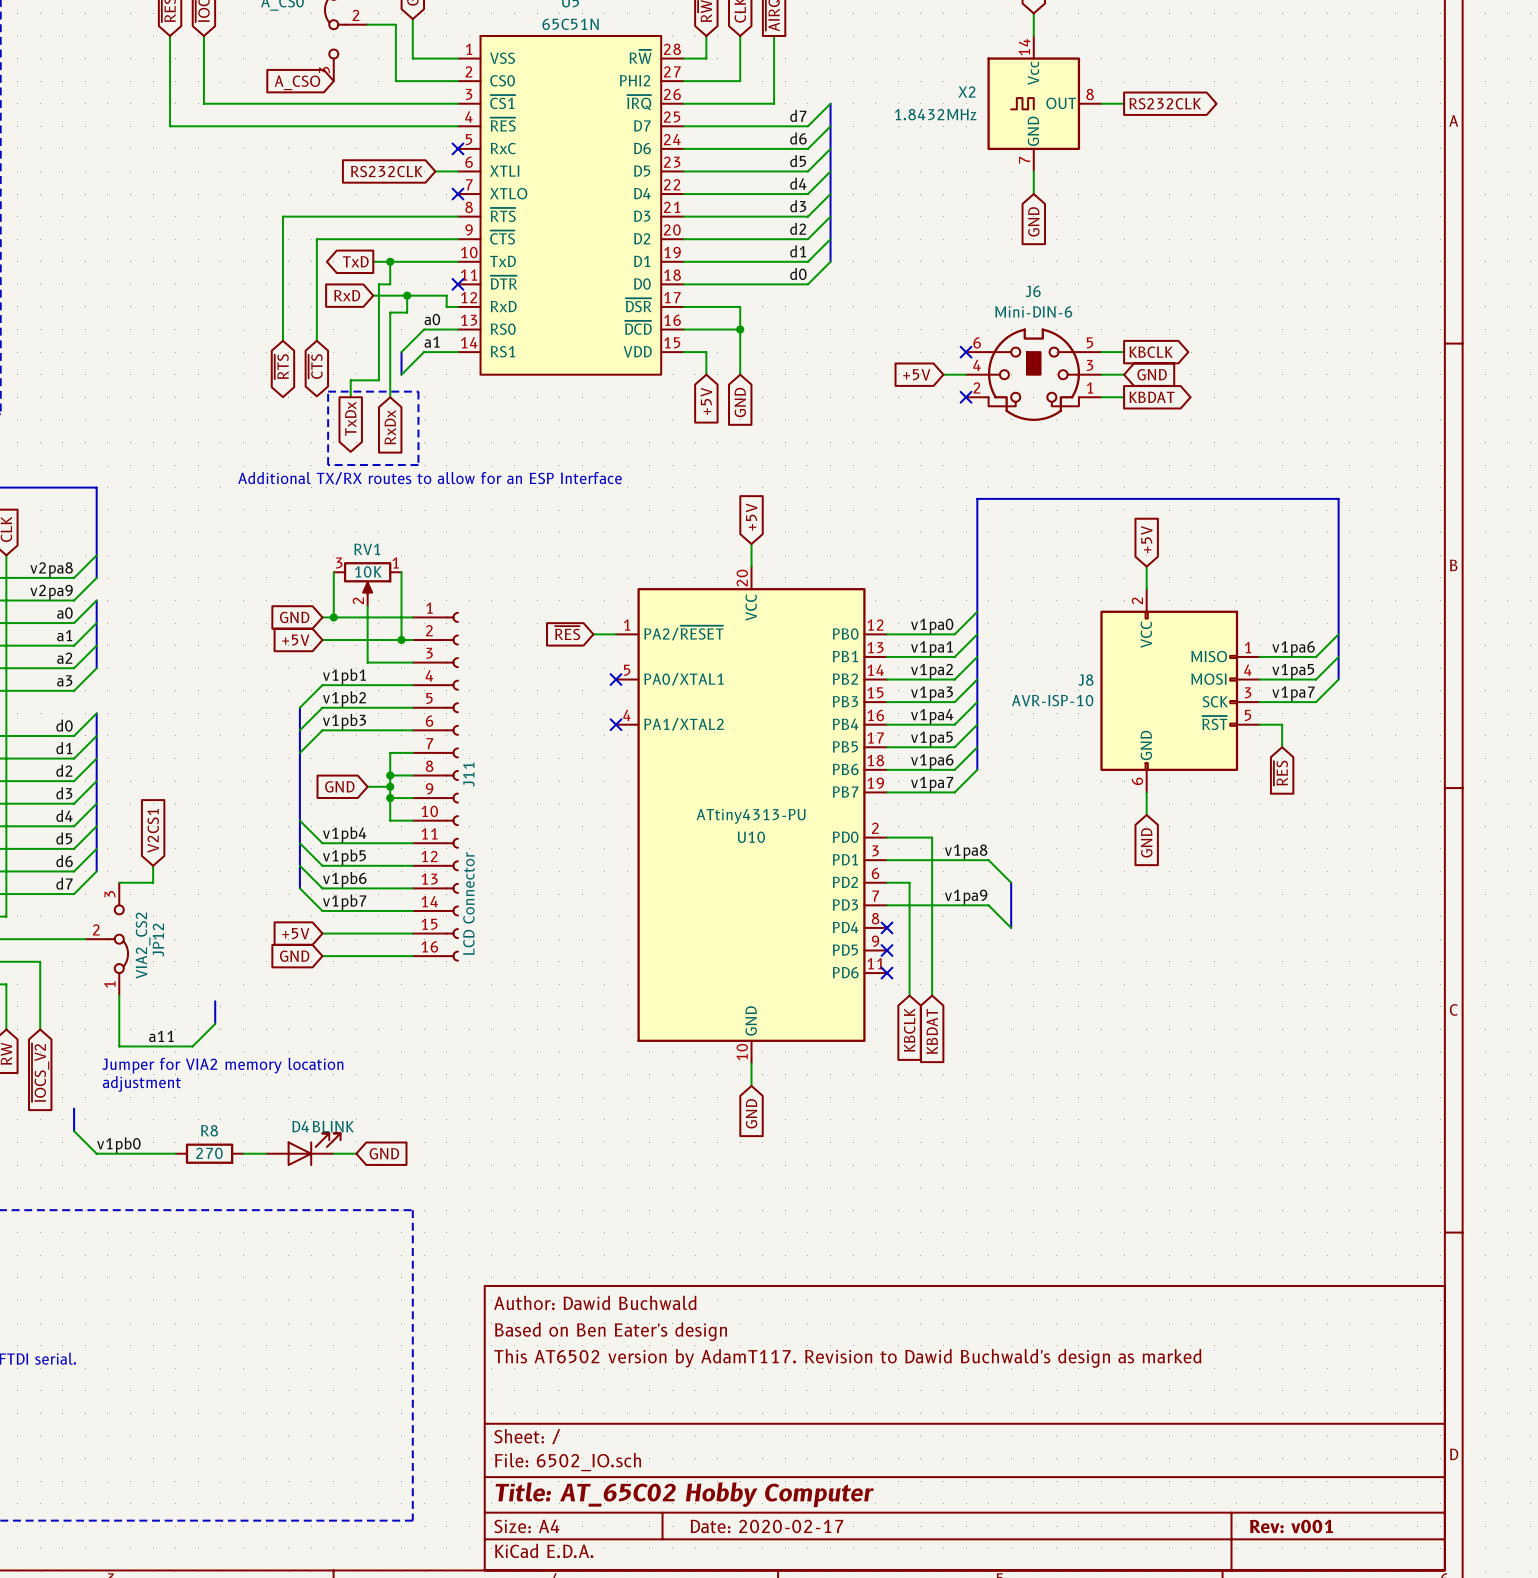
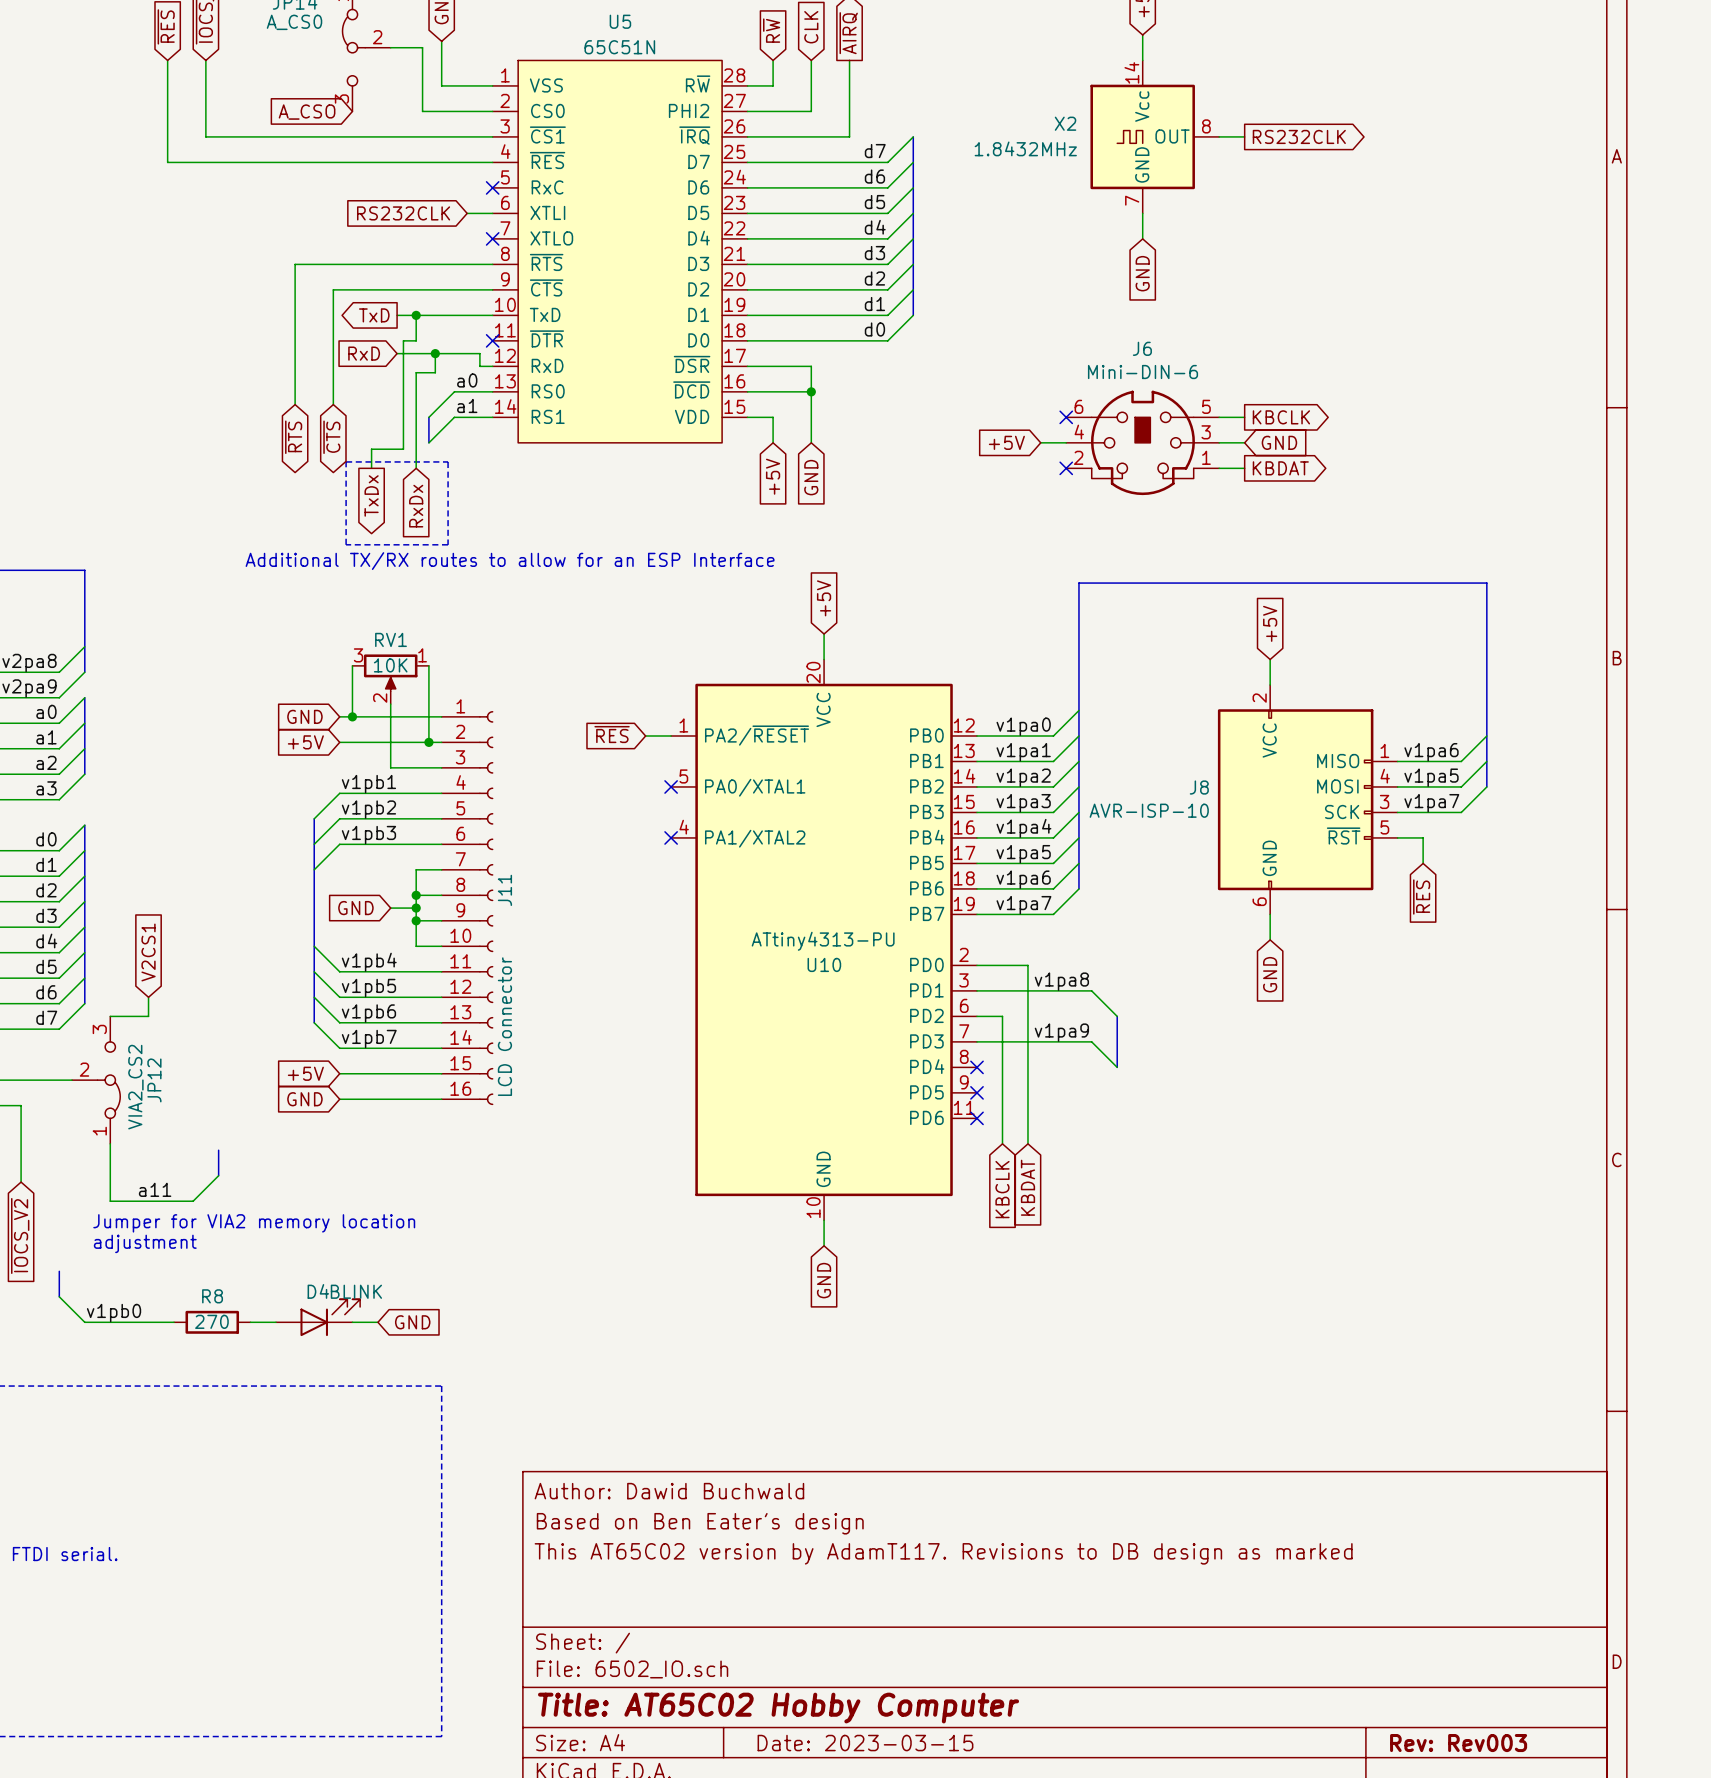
title block: This AT6502 version by AdamT117. Revision to Dawid Buchwald's design as marked (847, 1358) -> This AT65C02 version by AdamT117. Revisions to DB design as marked (943, 1553)
title block: Title: AT_65C02 Hobby Computer (684, 1494) -> Title: AT65C02 Hobby Computer (778, 1708)
title block: Date: 2020-02-17 (766, 1526) -> Date: 2023-03-15 (865, 1743)
title block: Rev: v001 (1291, 1526) -> Rev: Rev003 (1458, 1743)

